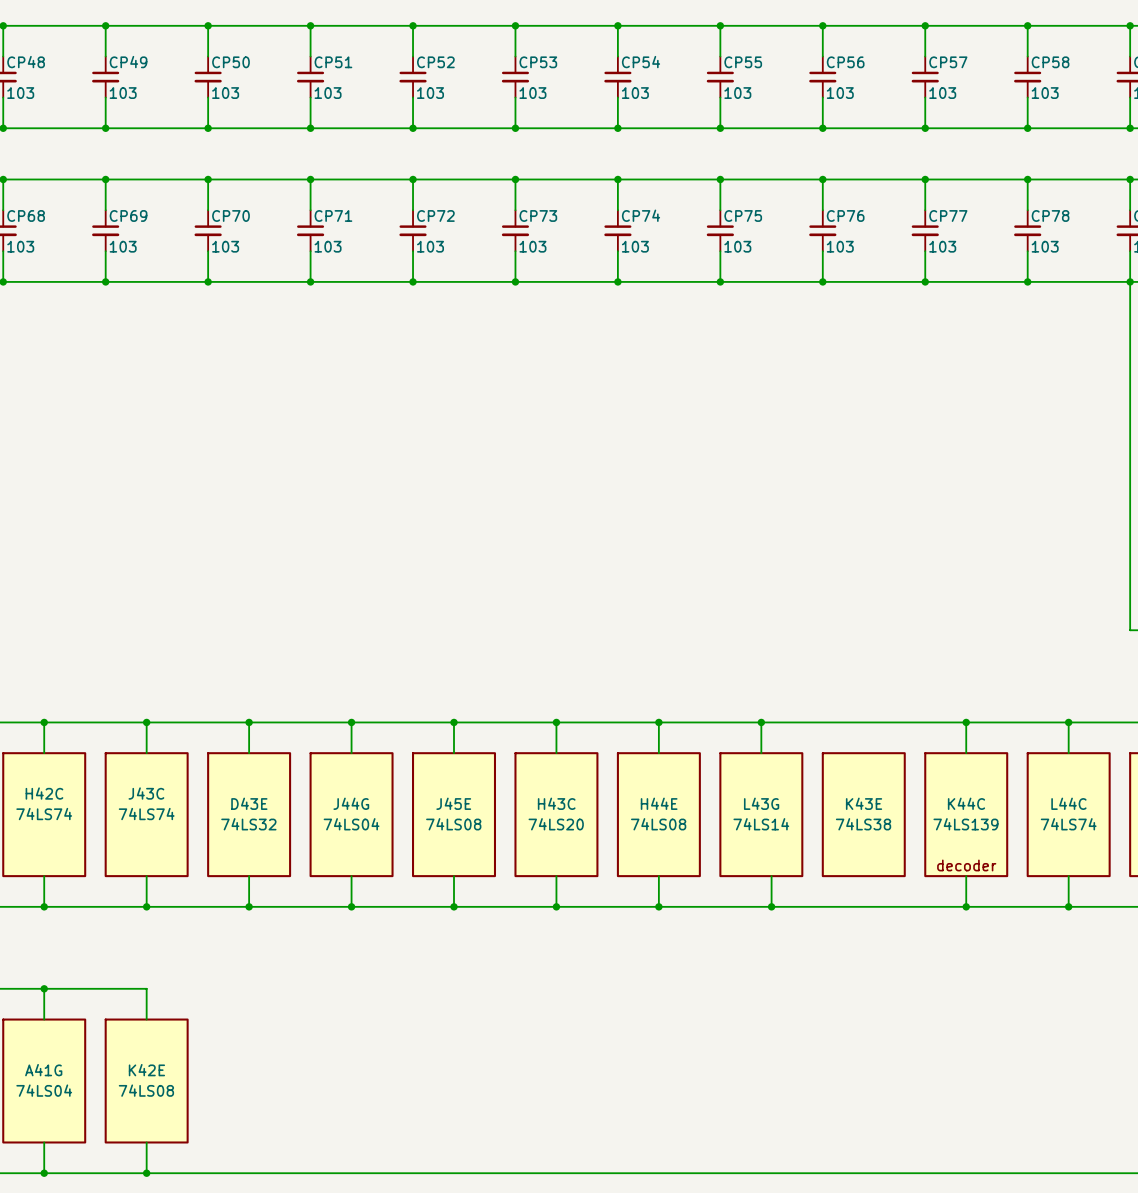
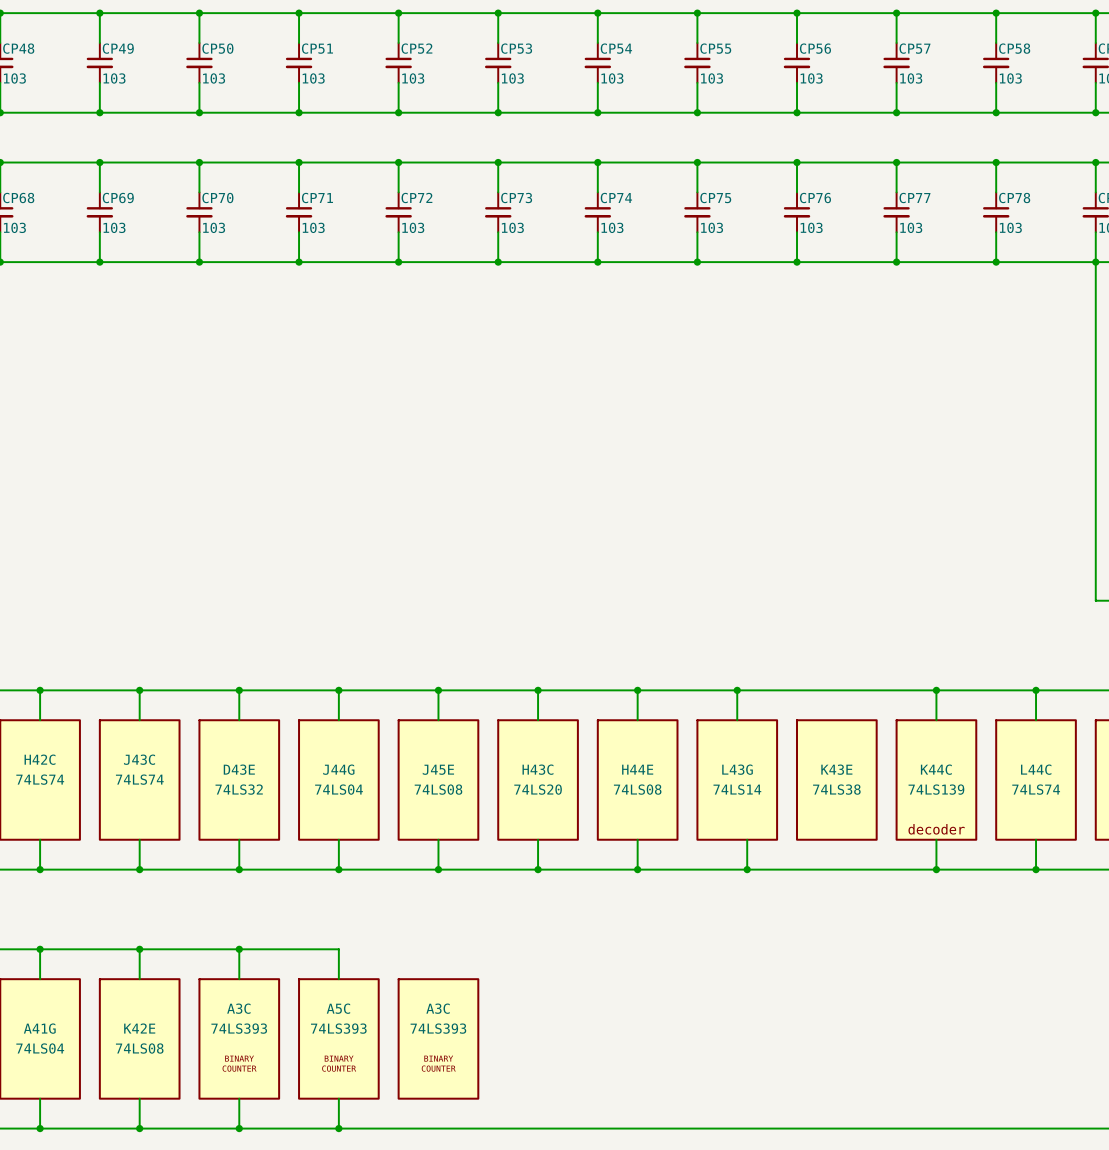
wire: none -> (139, 949) (338, 949) (338, 979)
junction: none -> (139, 949)
wire: none -> (239, 949) (239, 979)
junction: none -> (239, 949)
A3C: none -> 74LS393 (239, 1038)
A5C: none -> 74LS393 (338, 1038)
A3C: none -> 74LS393 (438, 1038)
wire: none -> (239, 1098) (239, 1128)
wire: none -> (338, 1098) (338, 1128)
junction: none -> (239, 1128)
junction: none -> (338, 1128)

